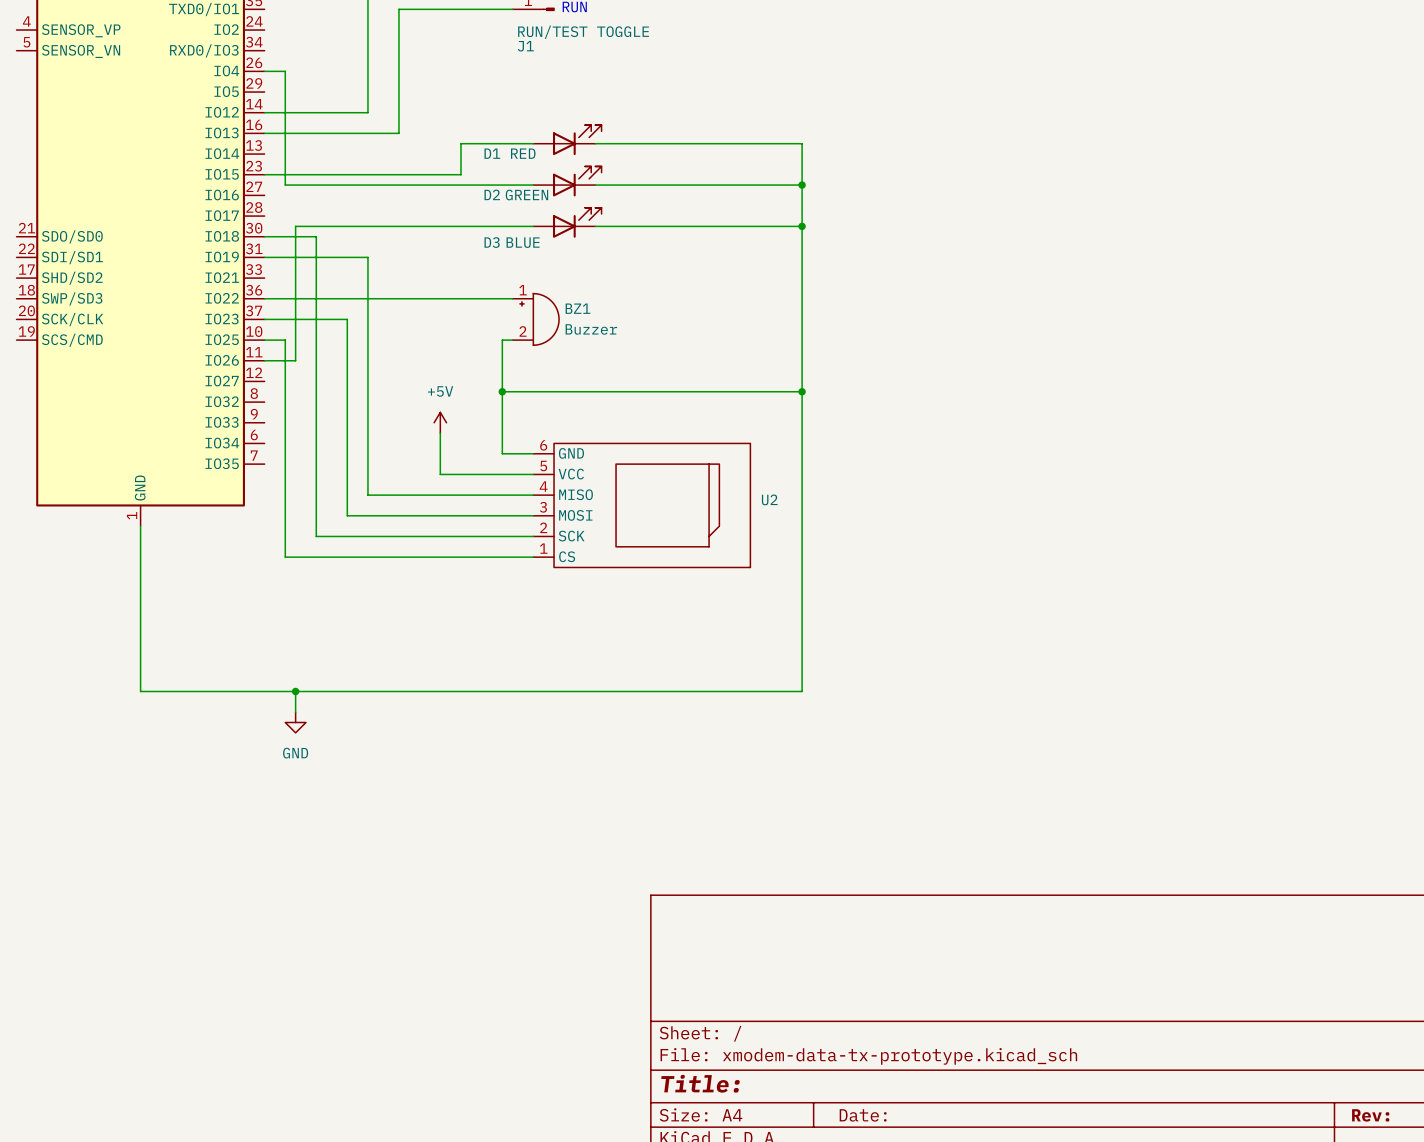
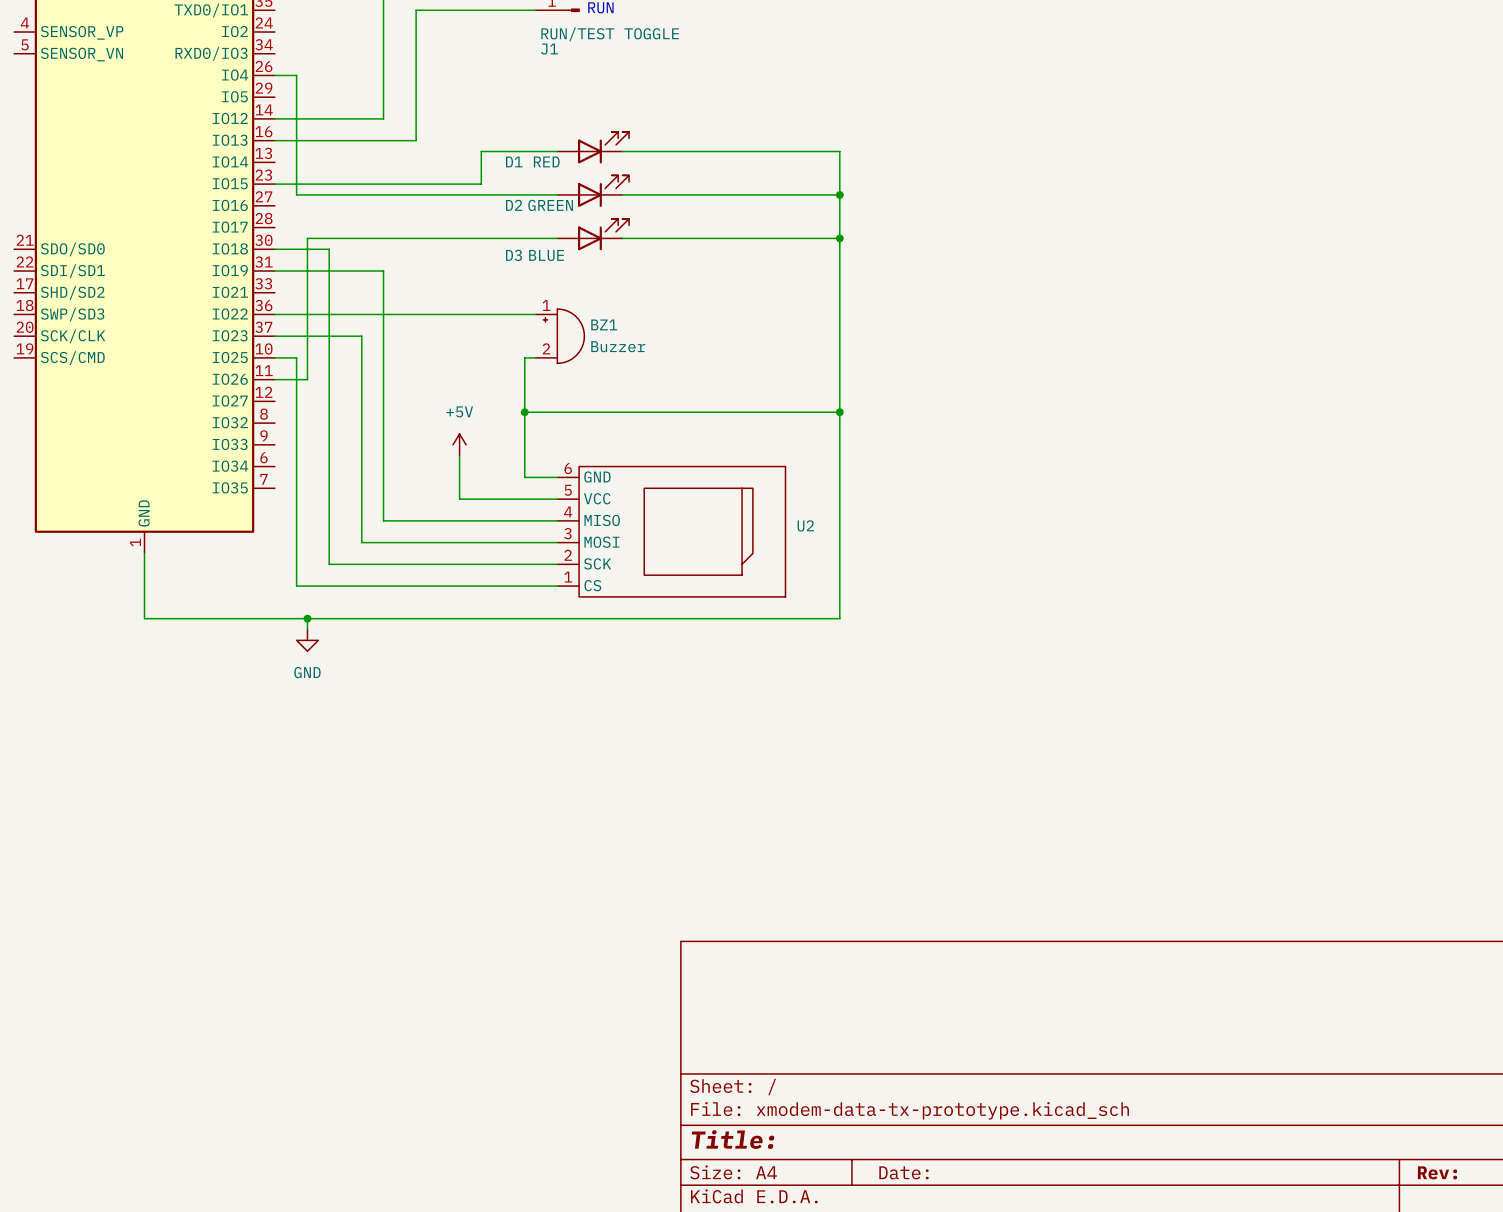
wire: (140, 588) (140, 691) (802, 691) (802, 588) -> (144, 618) (839, 618)
wire: none -> (307, 618) (307, 629)
junction: none -> (307, 618)
wire: (295, 691) (295, 712) -> none
junction: (295, 691) -> none
power symbol position: GND (295, 722) -> GND (307, 640)

